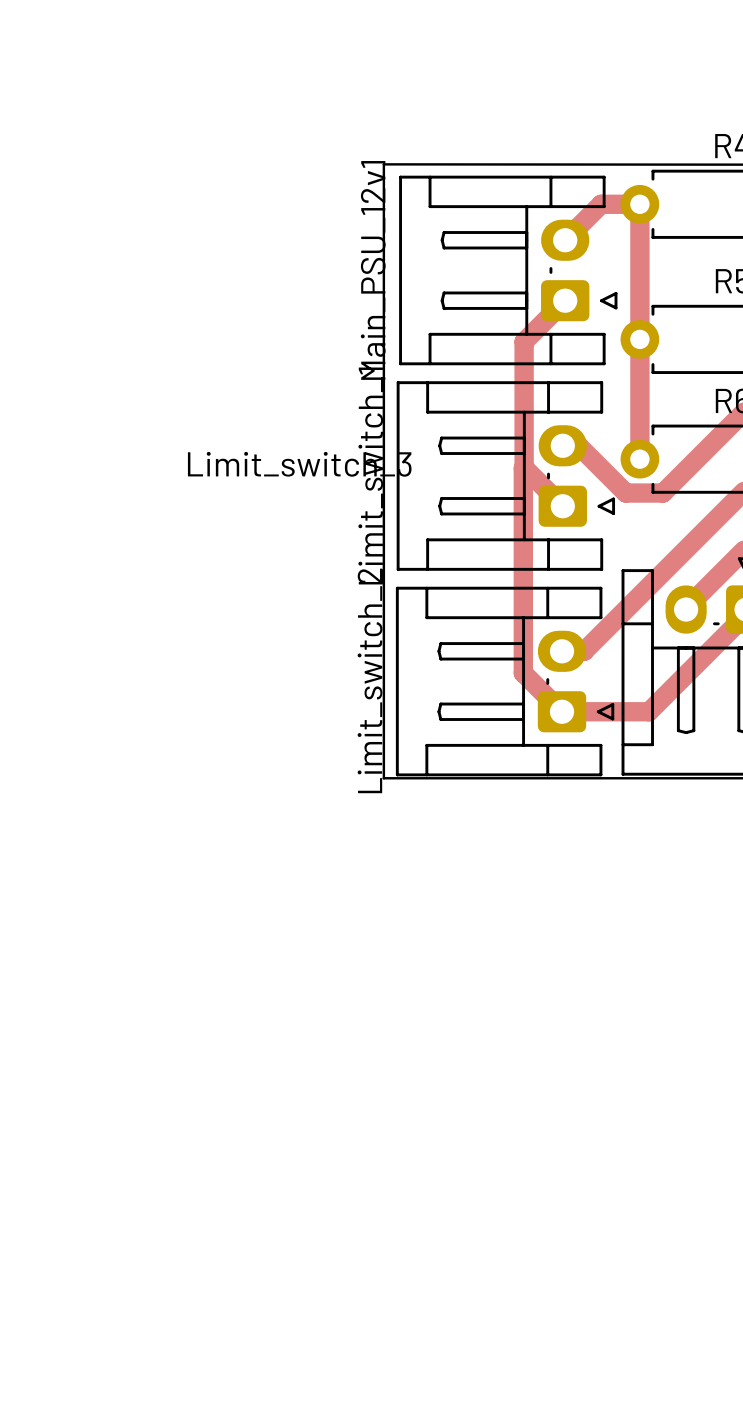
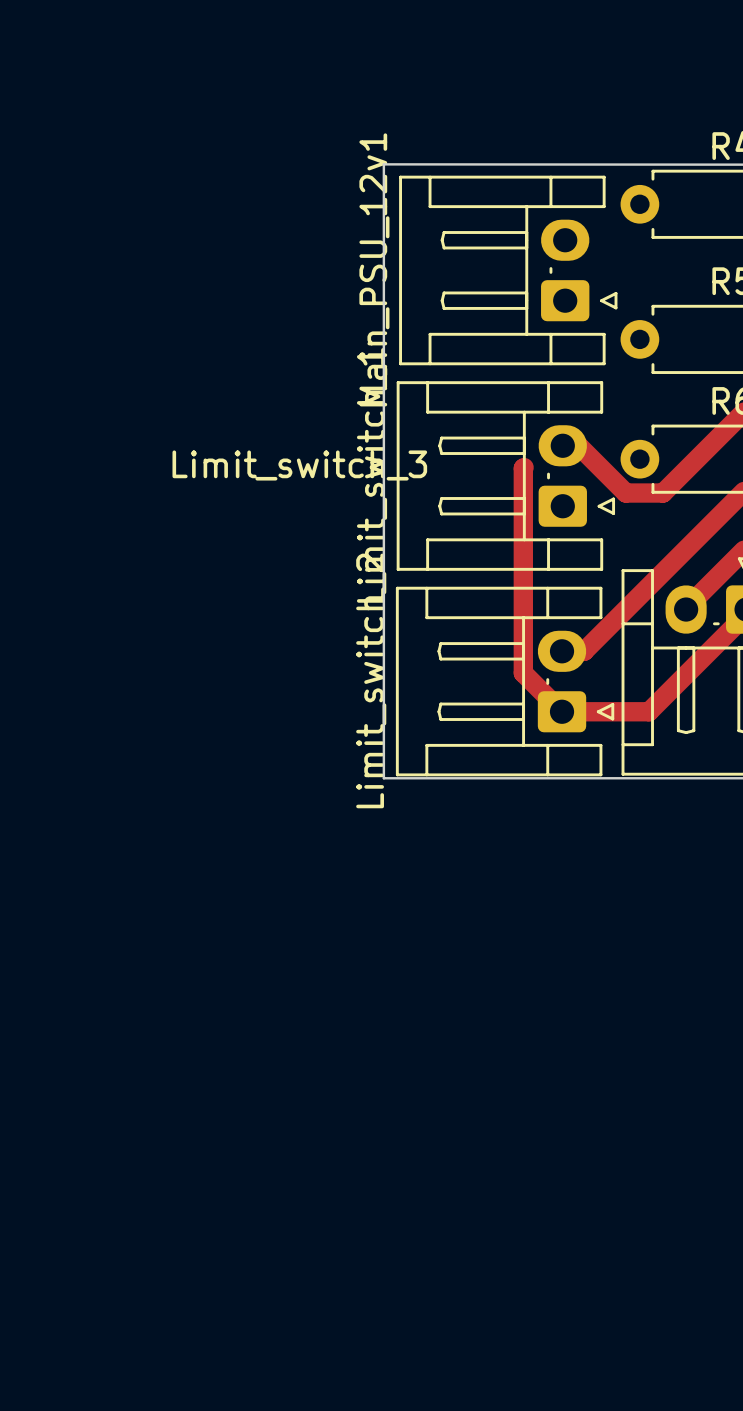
top track: (565, 240) (601, 204) (639, 204) (639, 459) -> none
top track: (565, 300) (524, 341) (524, 467) (562, 506) -> none

